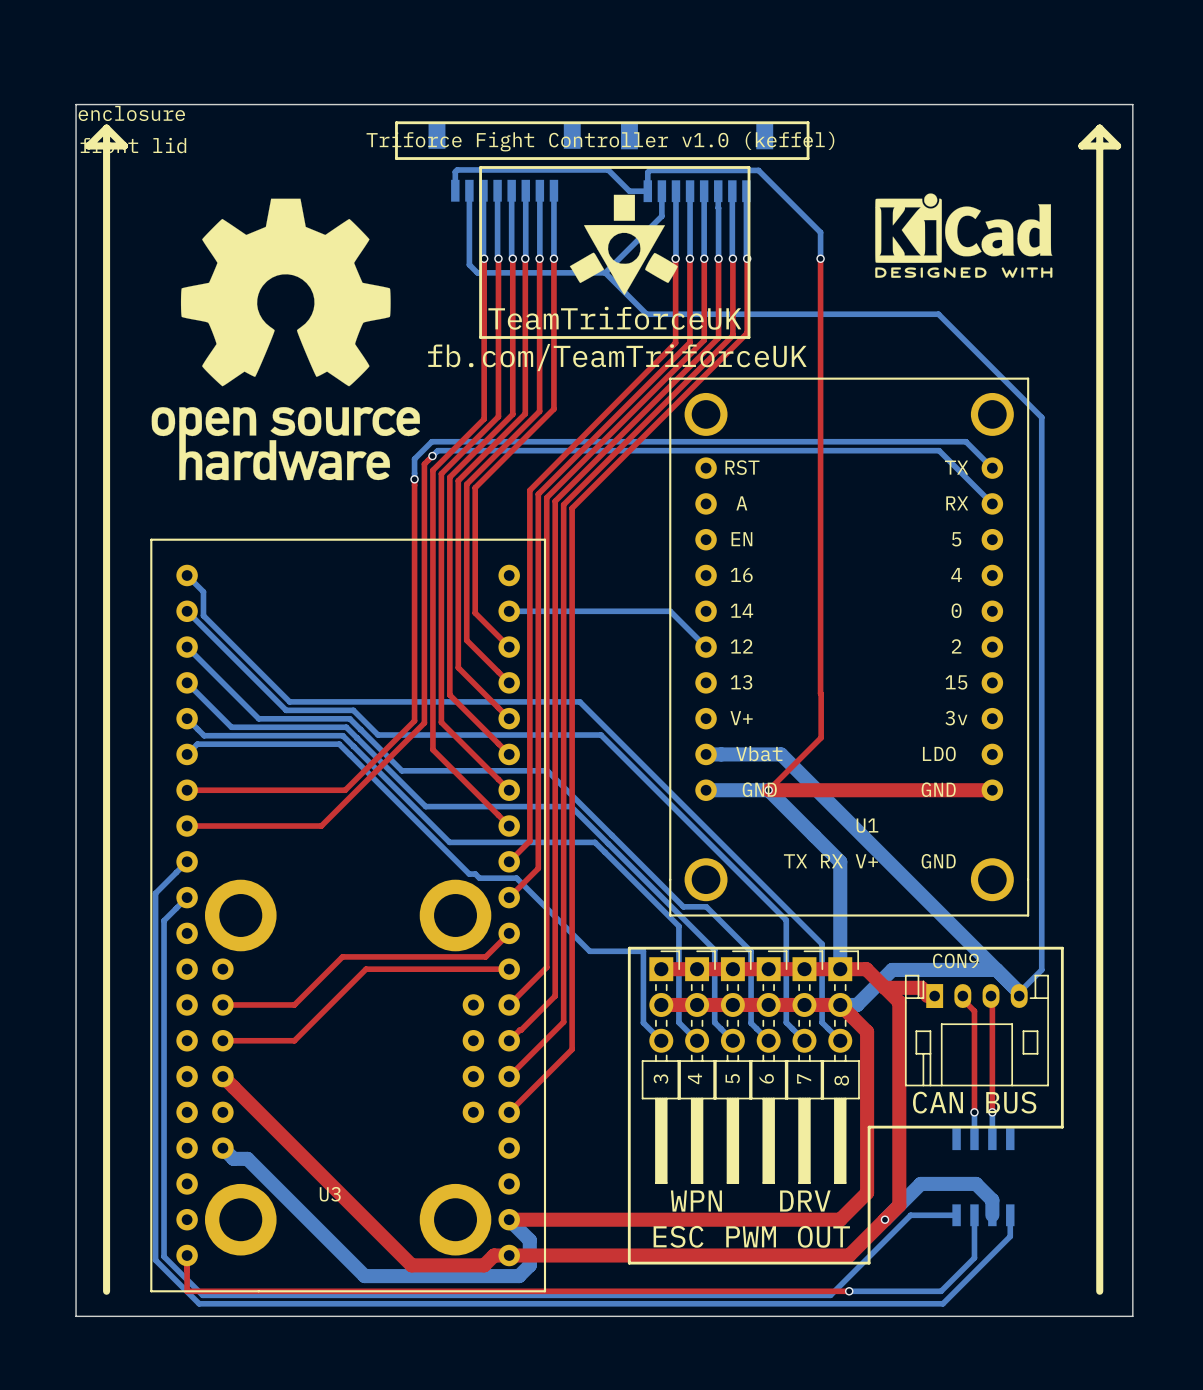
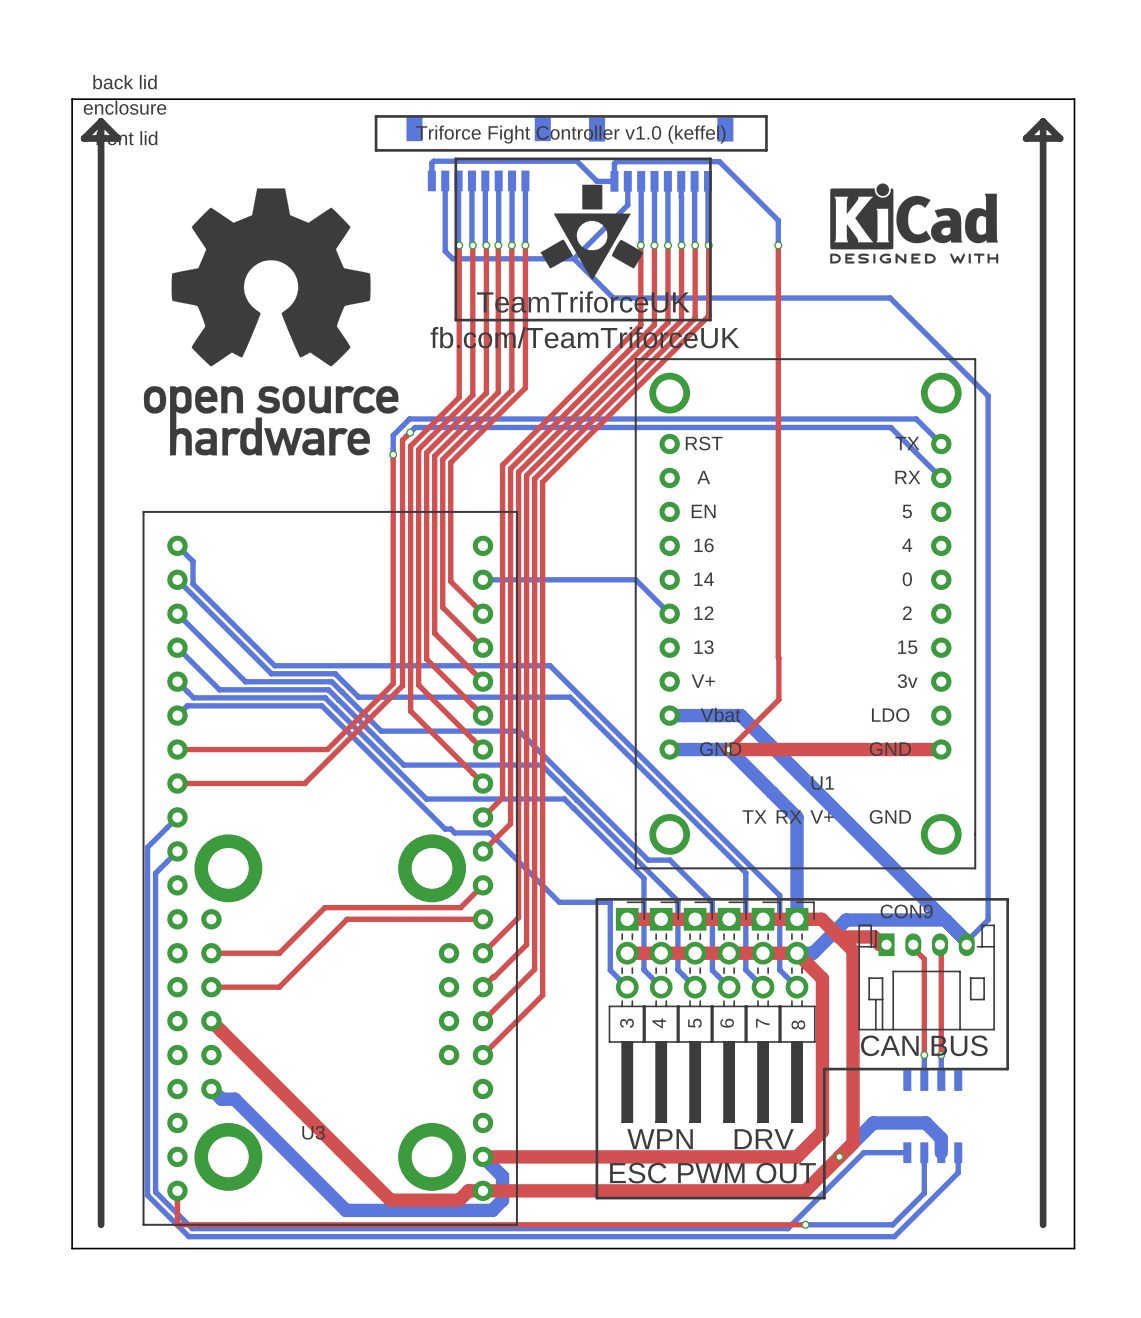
back lid: none -> (125, 82)

